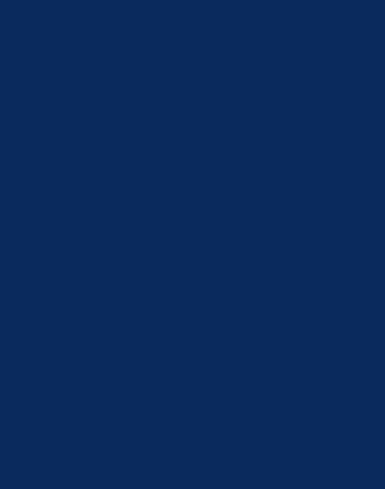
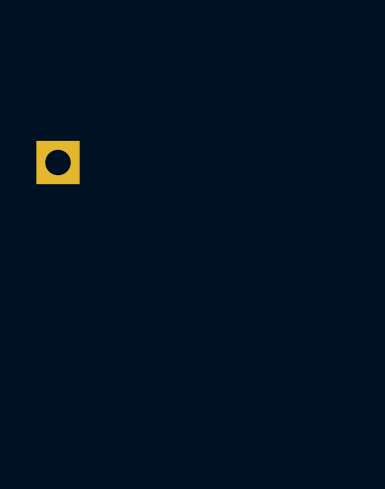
part: none -> (58, 162)

